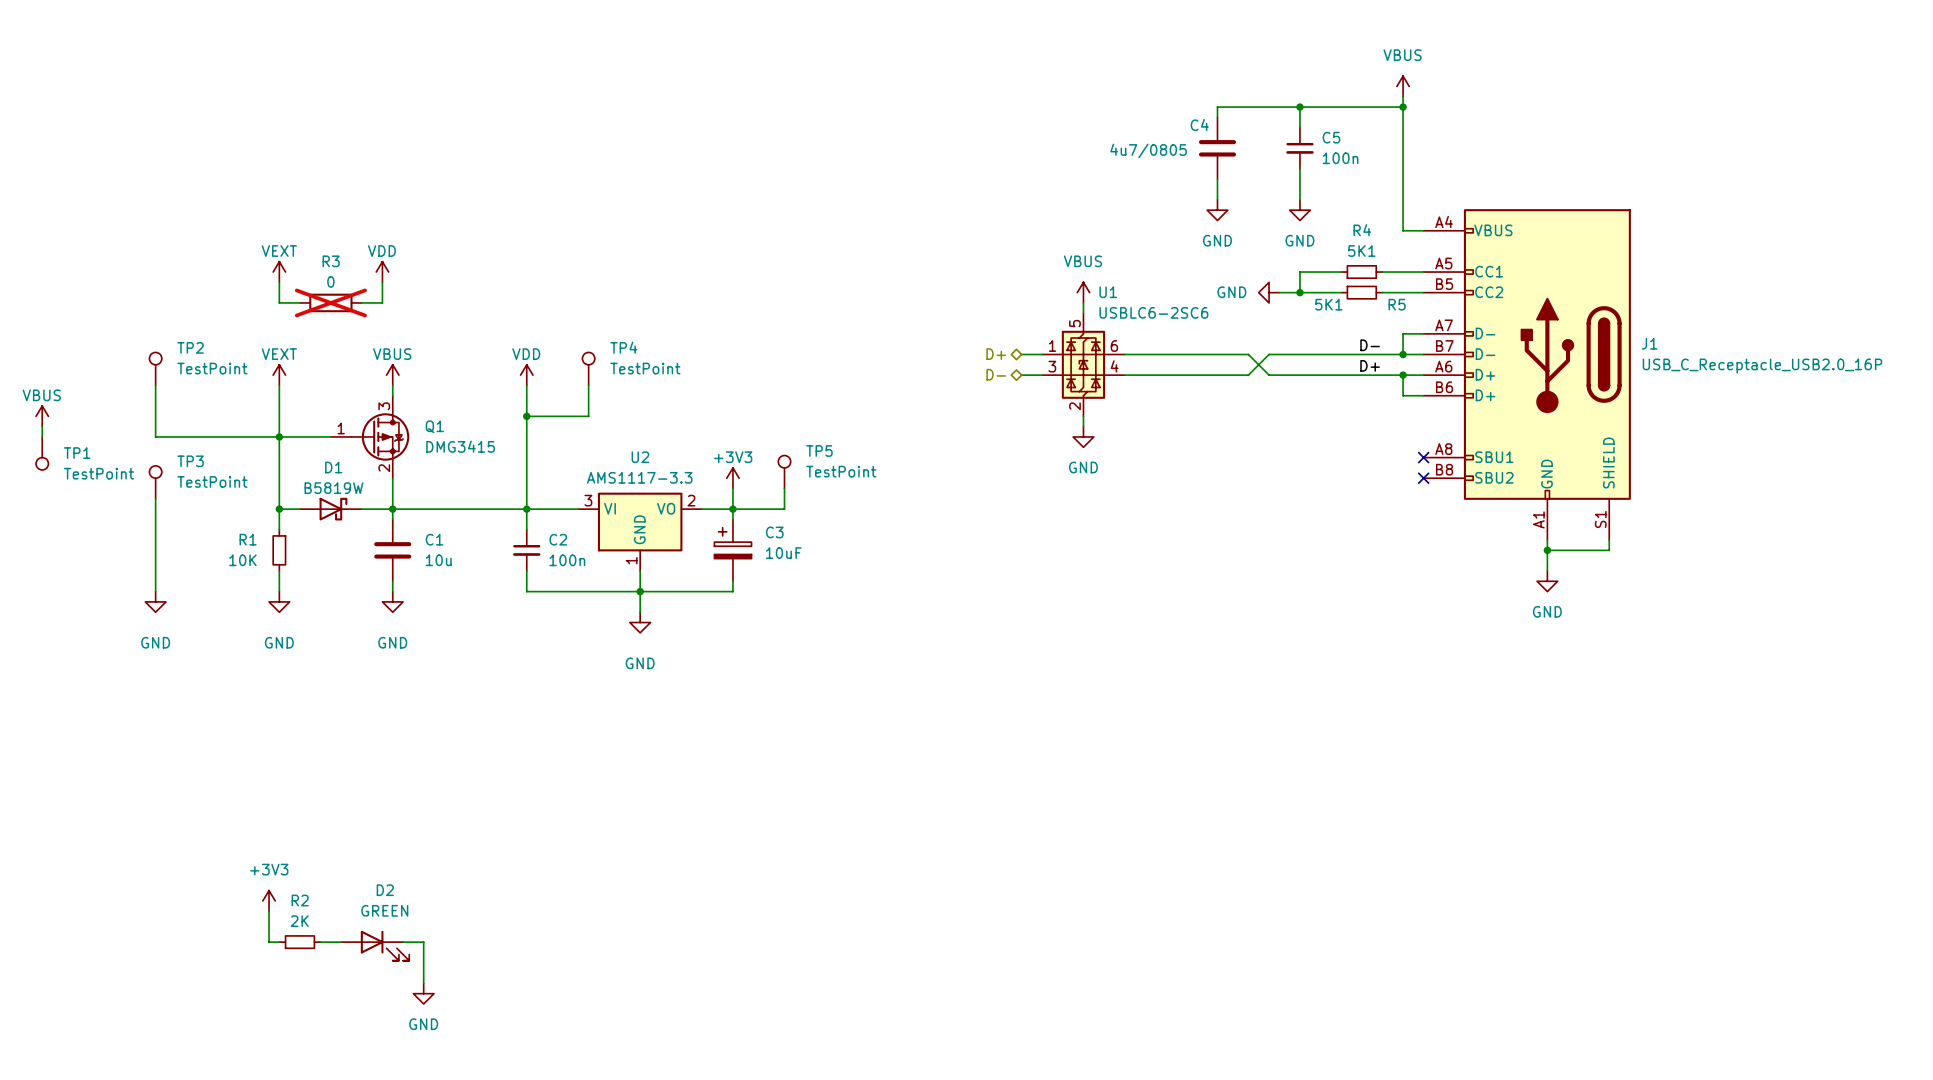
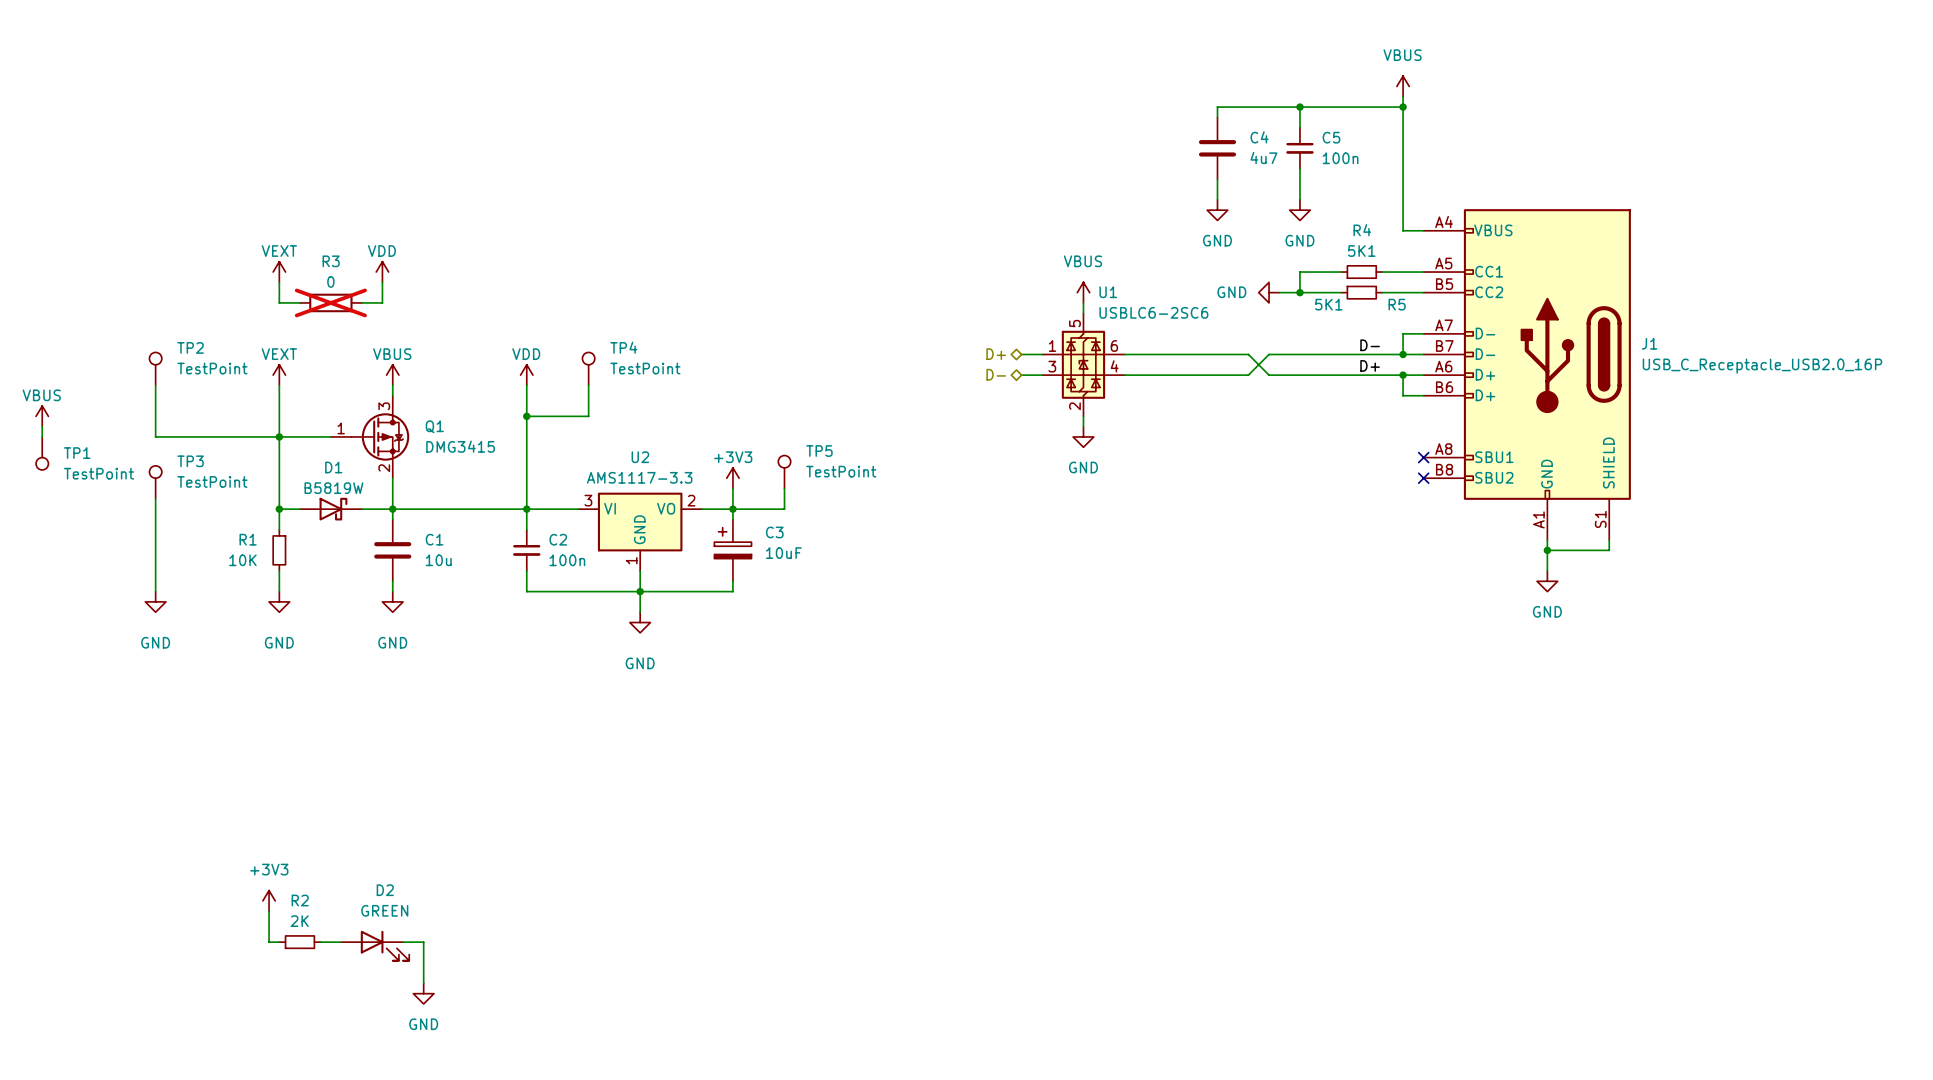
C4 name position: C4 (1199, 125) -> C4 (1259, 137)
C4 value: 4u7/0805 (1148, 150) -> 4u7 (1263, 157)

